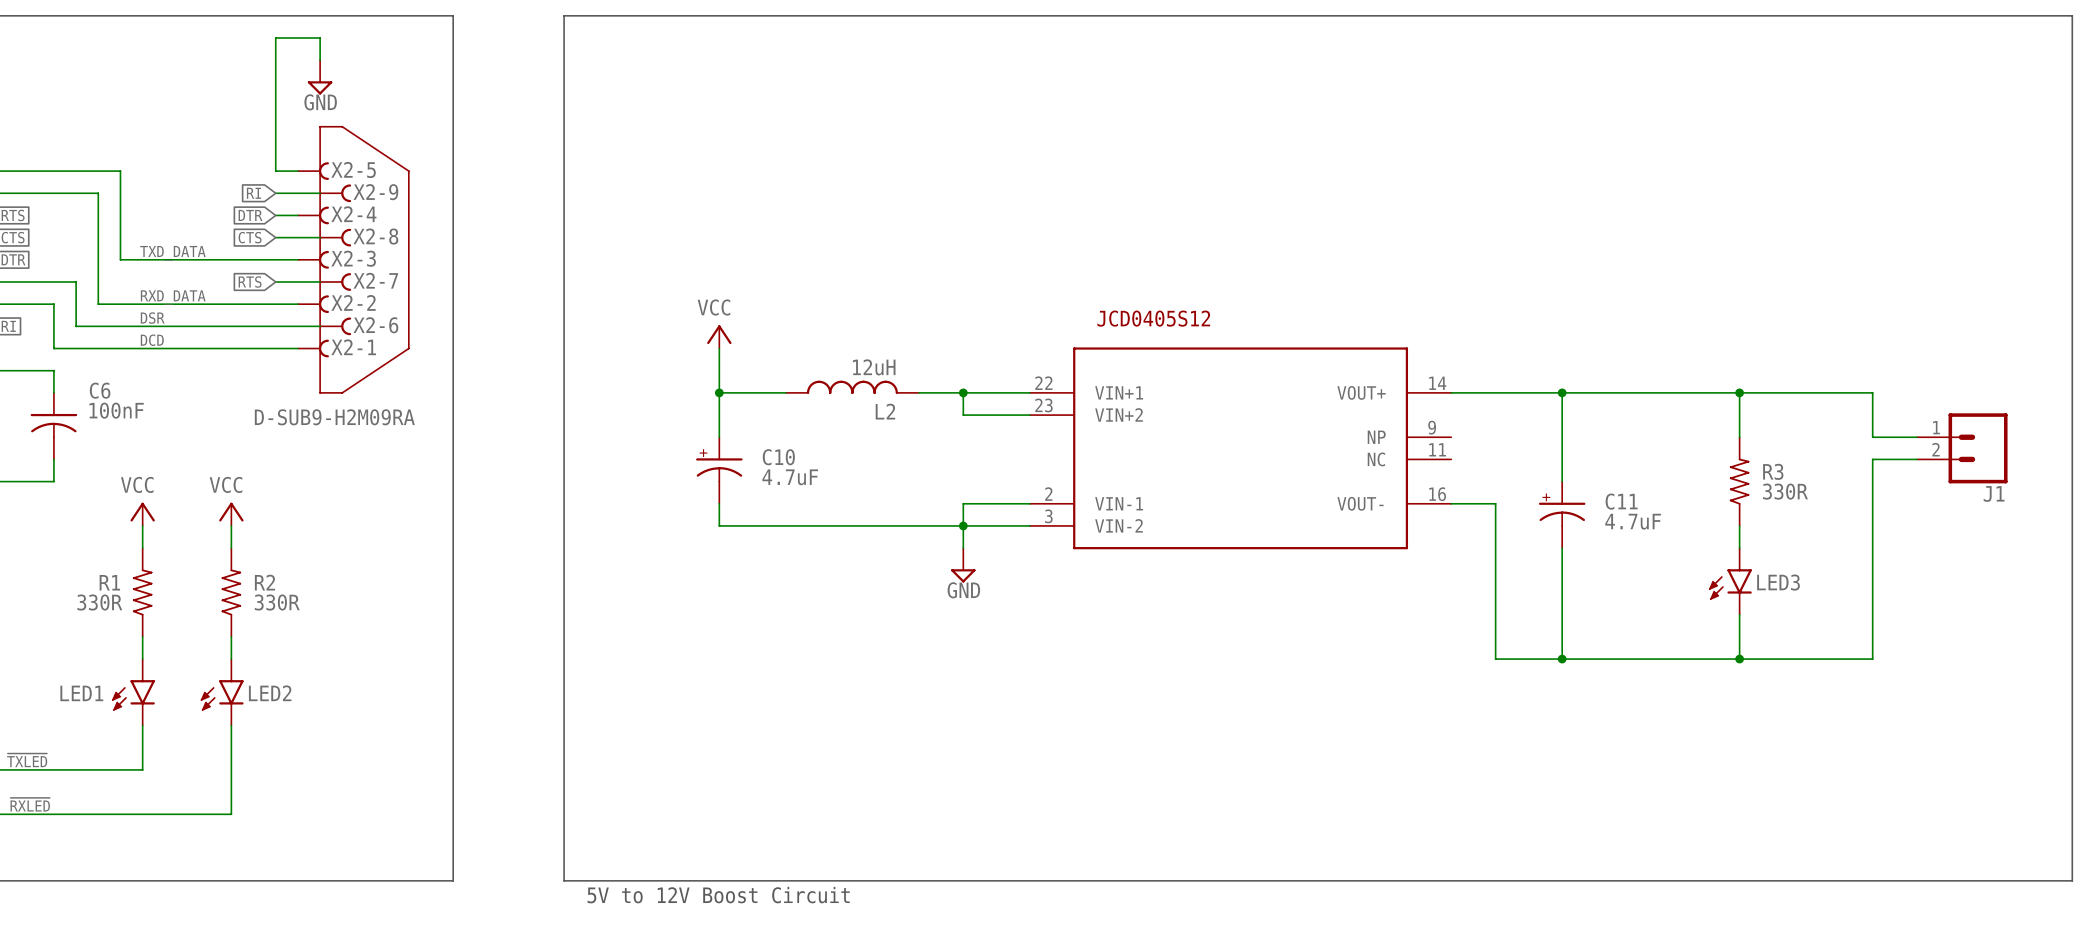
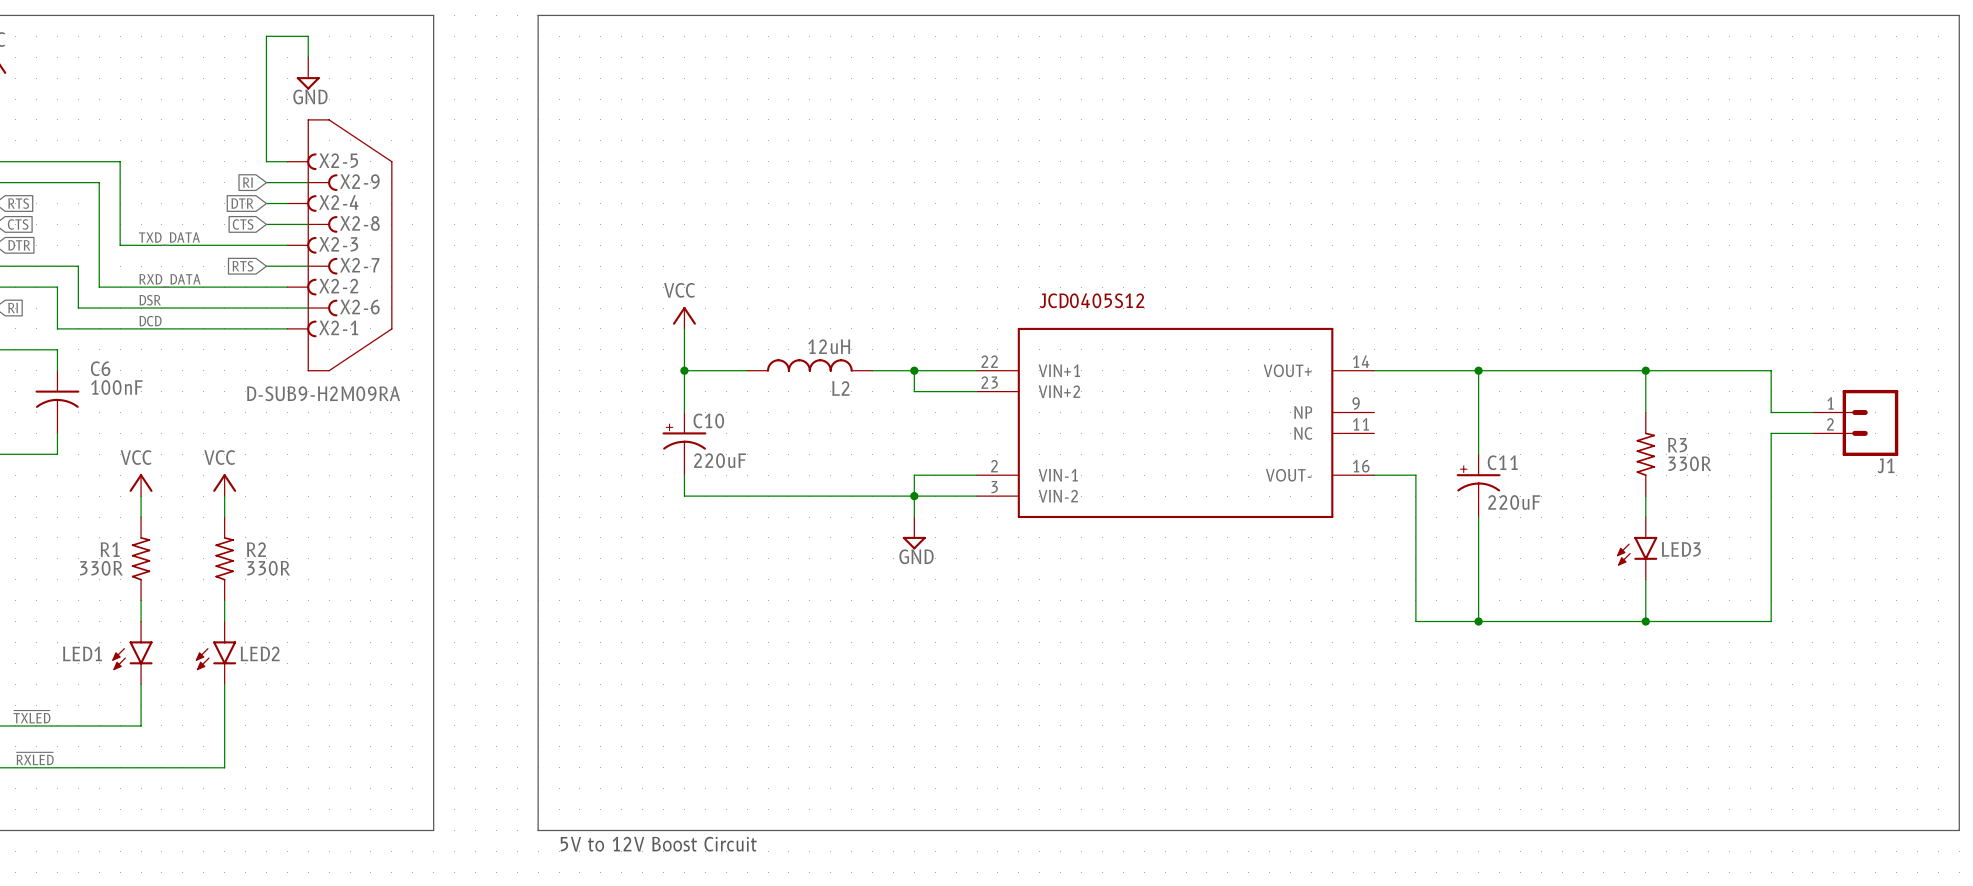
C10 name position: C10 (778, 457) -> C10 (708, 420)
C10 value: 4.7uF (790, 477) -> 220uF (720, 460)
C11 name position: C11 (1621, 501) -> C11 (1502, 462)
C11 value: 4.7uF (1633, 521) -> 220uF (1514, 502)

